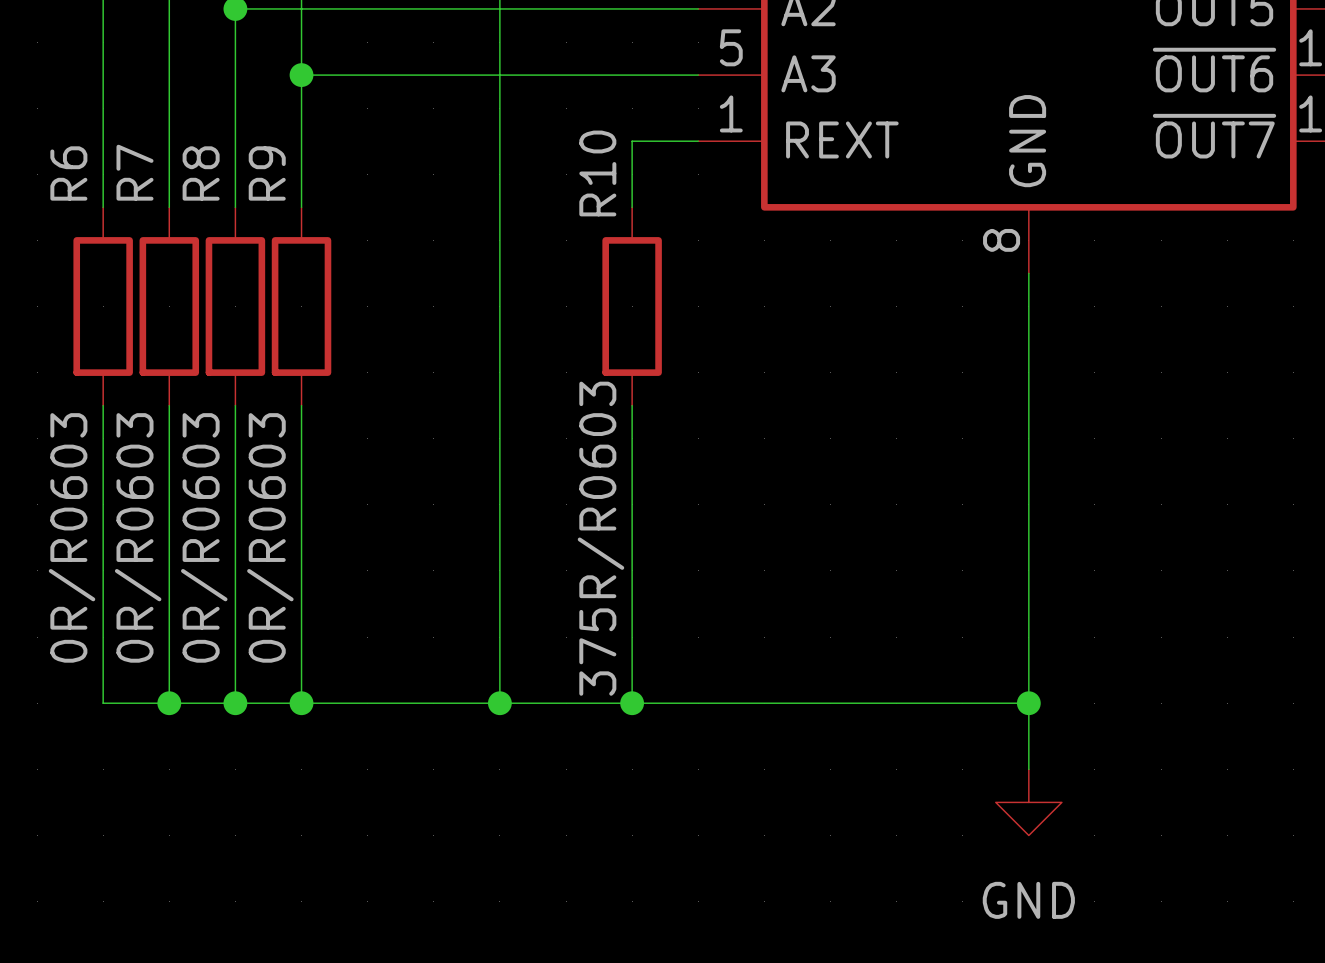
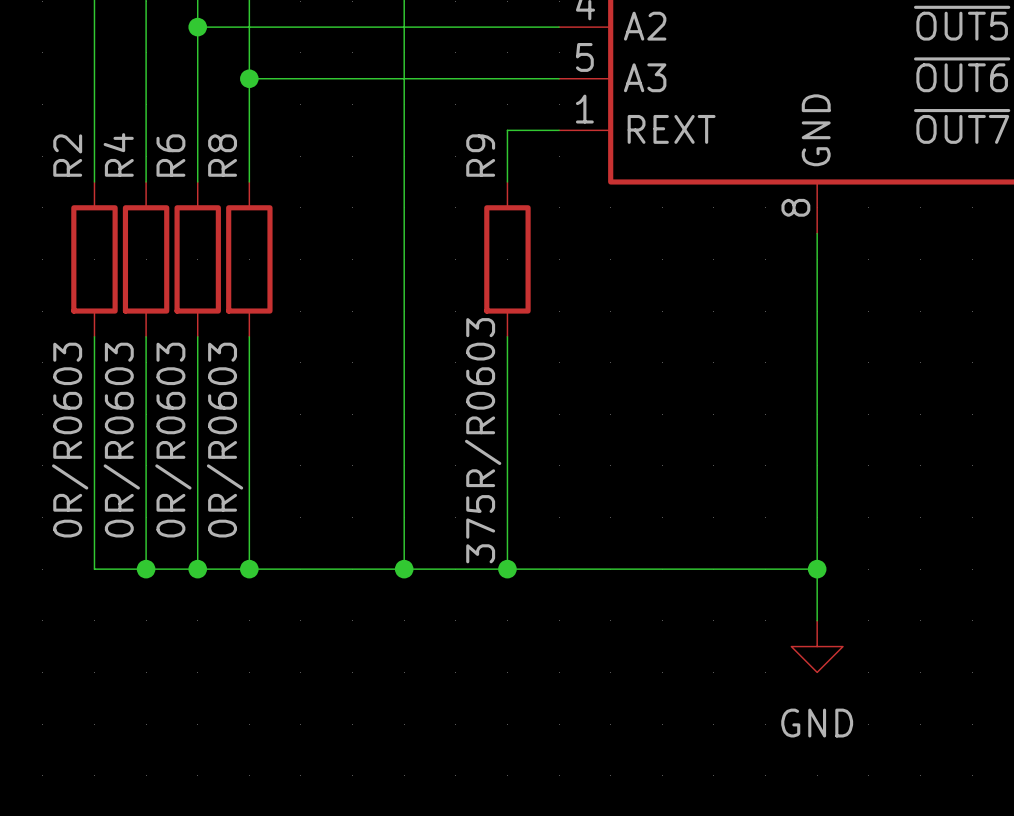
R7 name: R7 (134, 172) -> R4 (118, 154)
R6 name: R6 (68, 173) -> R2 (67, 155)
R8 name: R8 (201, 173) -> R6 (170, 155)
R9 name: R9 (267, 173) -> R8 (222, 155)
R10 name: R10 (597, 173) -> R9 (480, 155)

